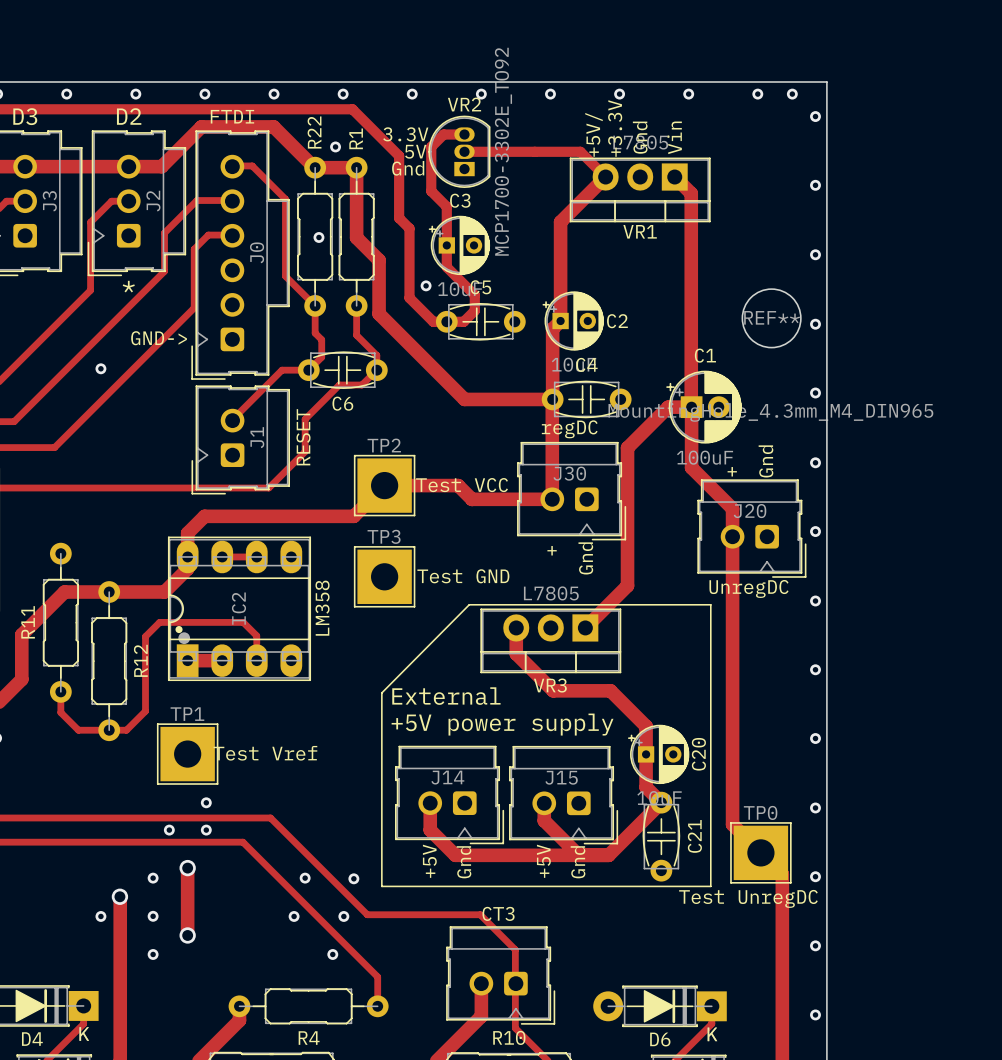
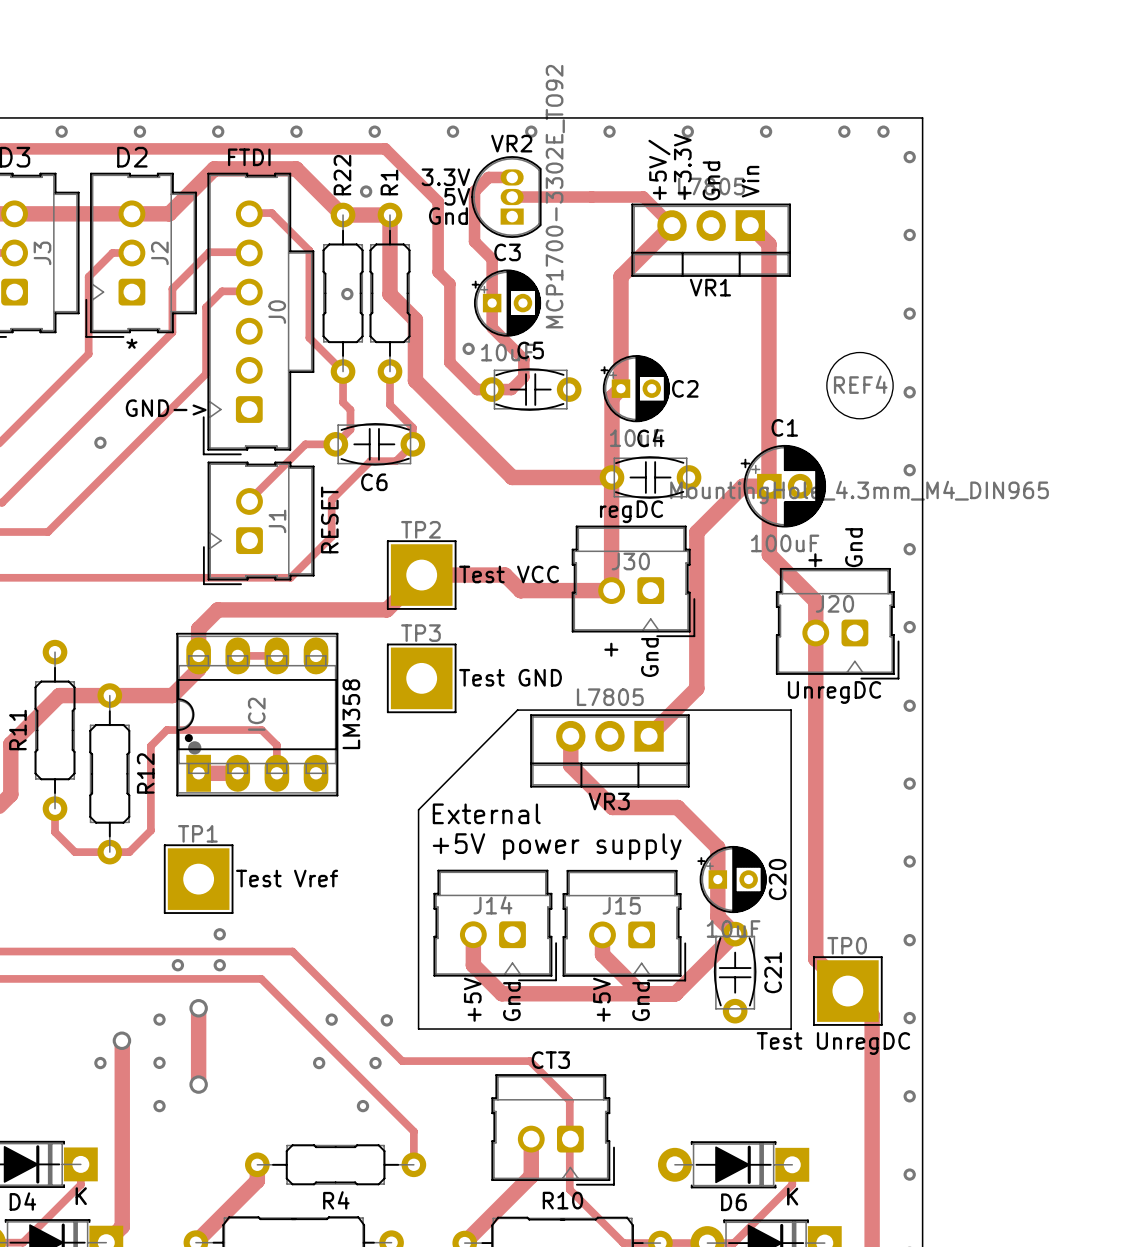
REF** name: REF** (772, 317) -> REF4 (860, 384)

